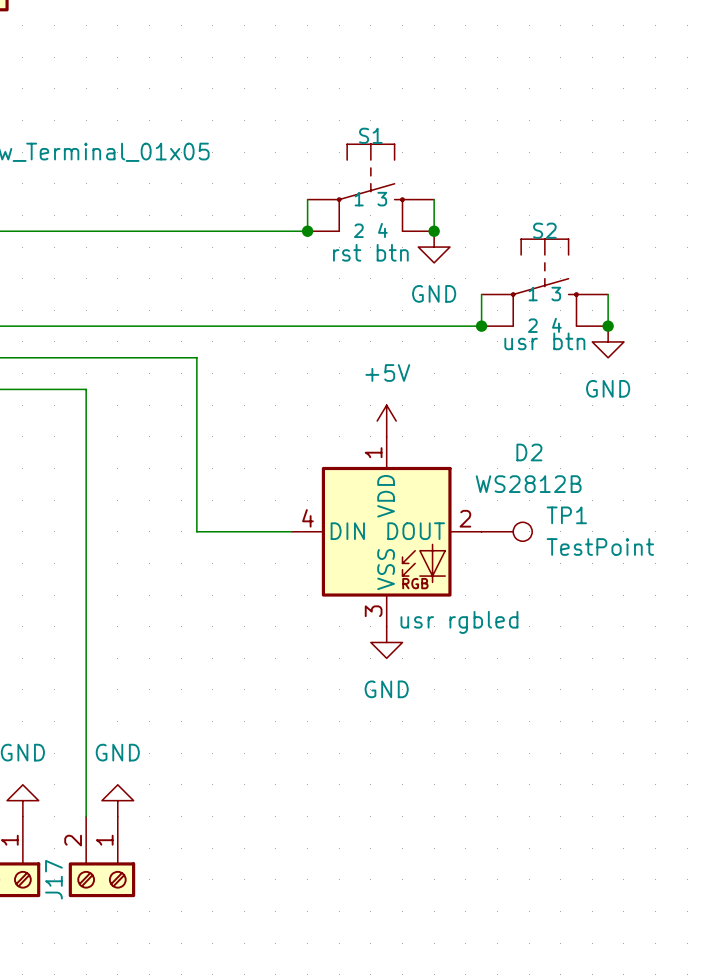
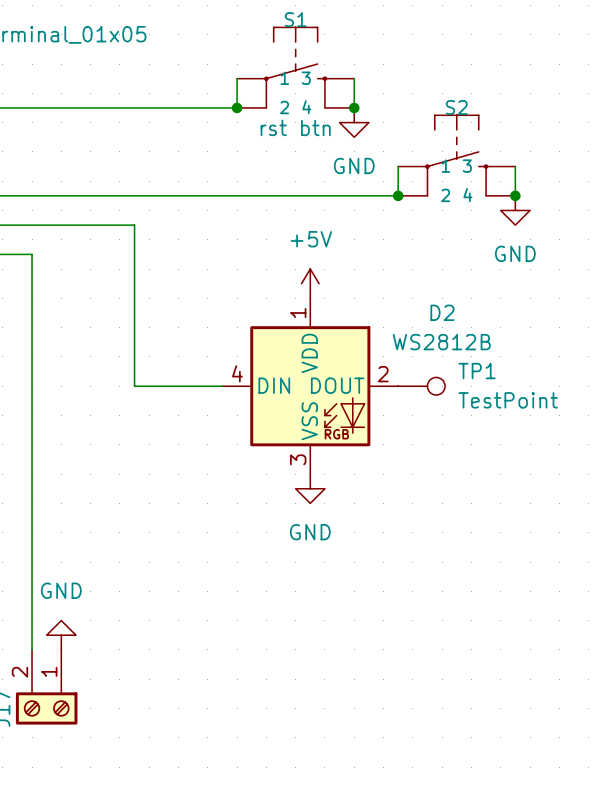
S2 text: usr btn (544, 341) -> none
D2 text: usr rgbled (459, 622) -> none

